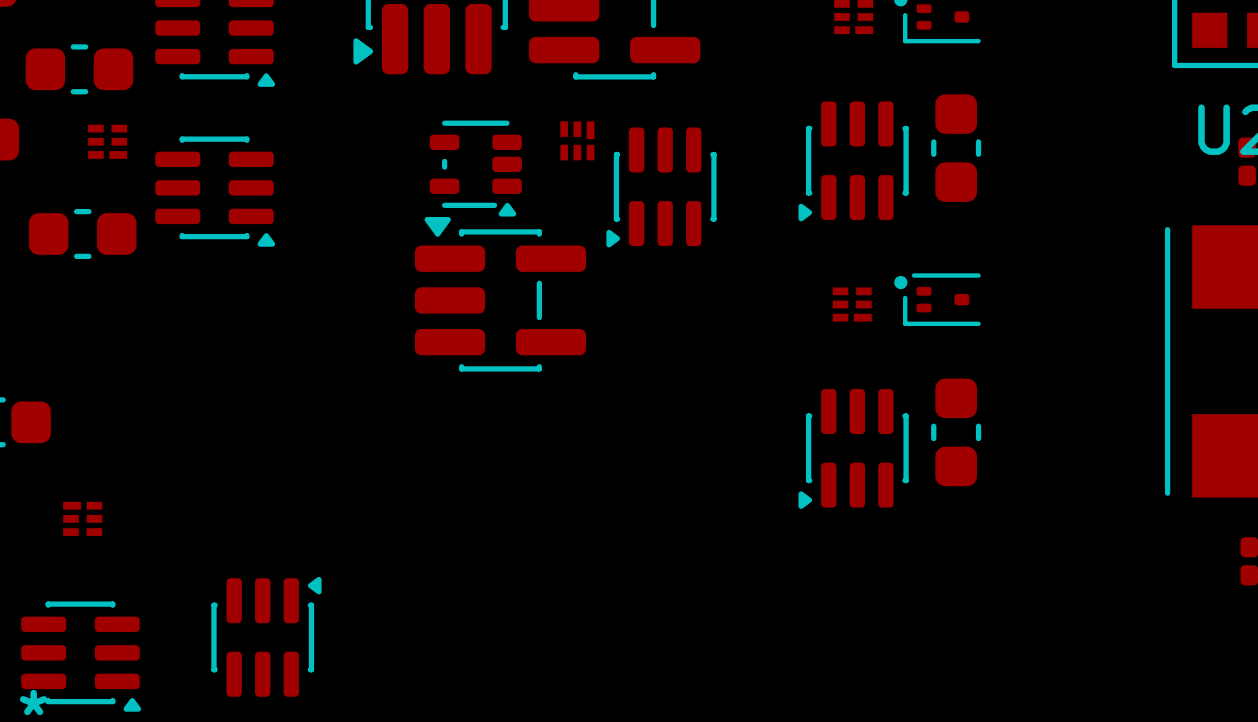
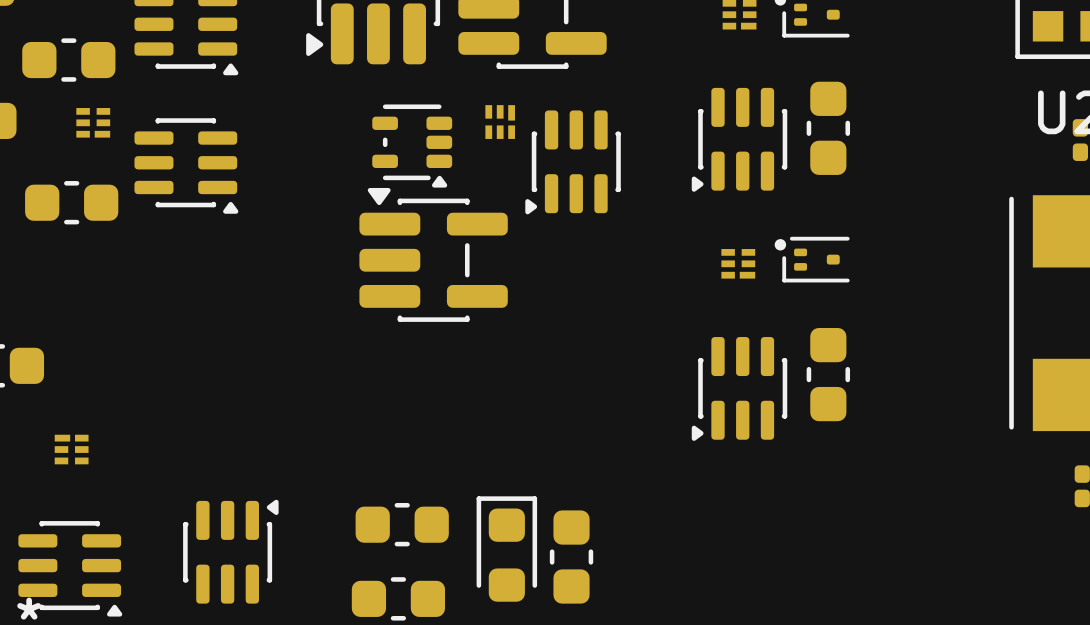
part: none -> (402, 524)
part: none -> (506, 549)
part: none -> (571, 557)
part: none -> (398, 598)

